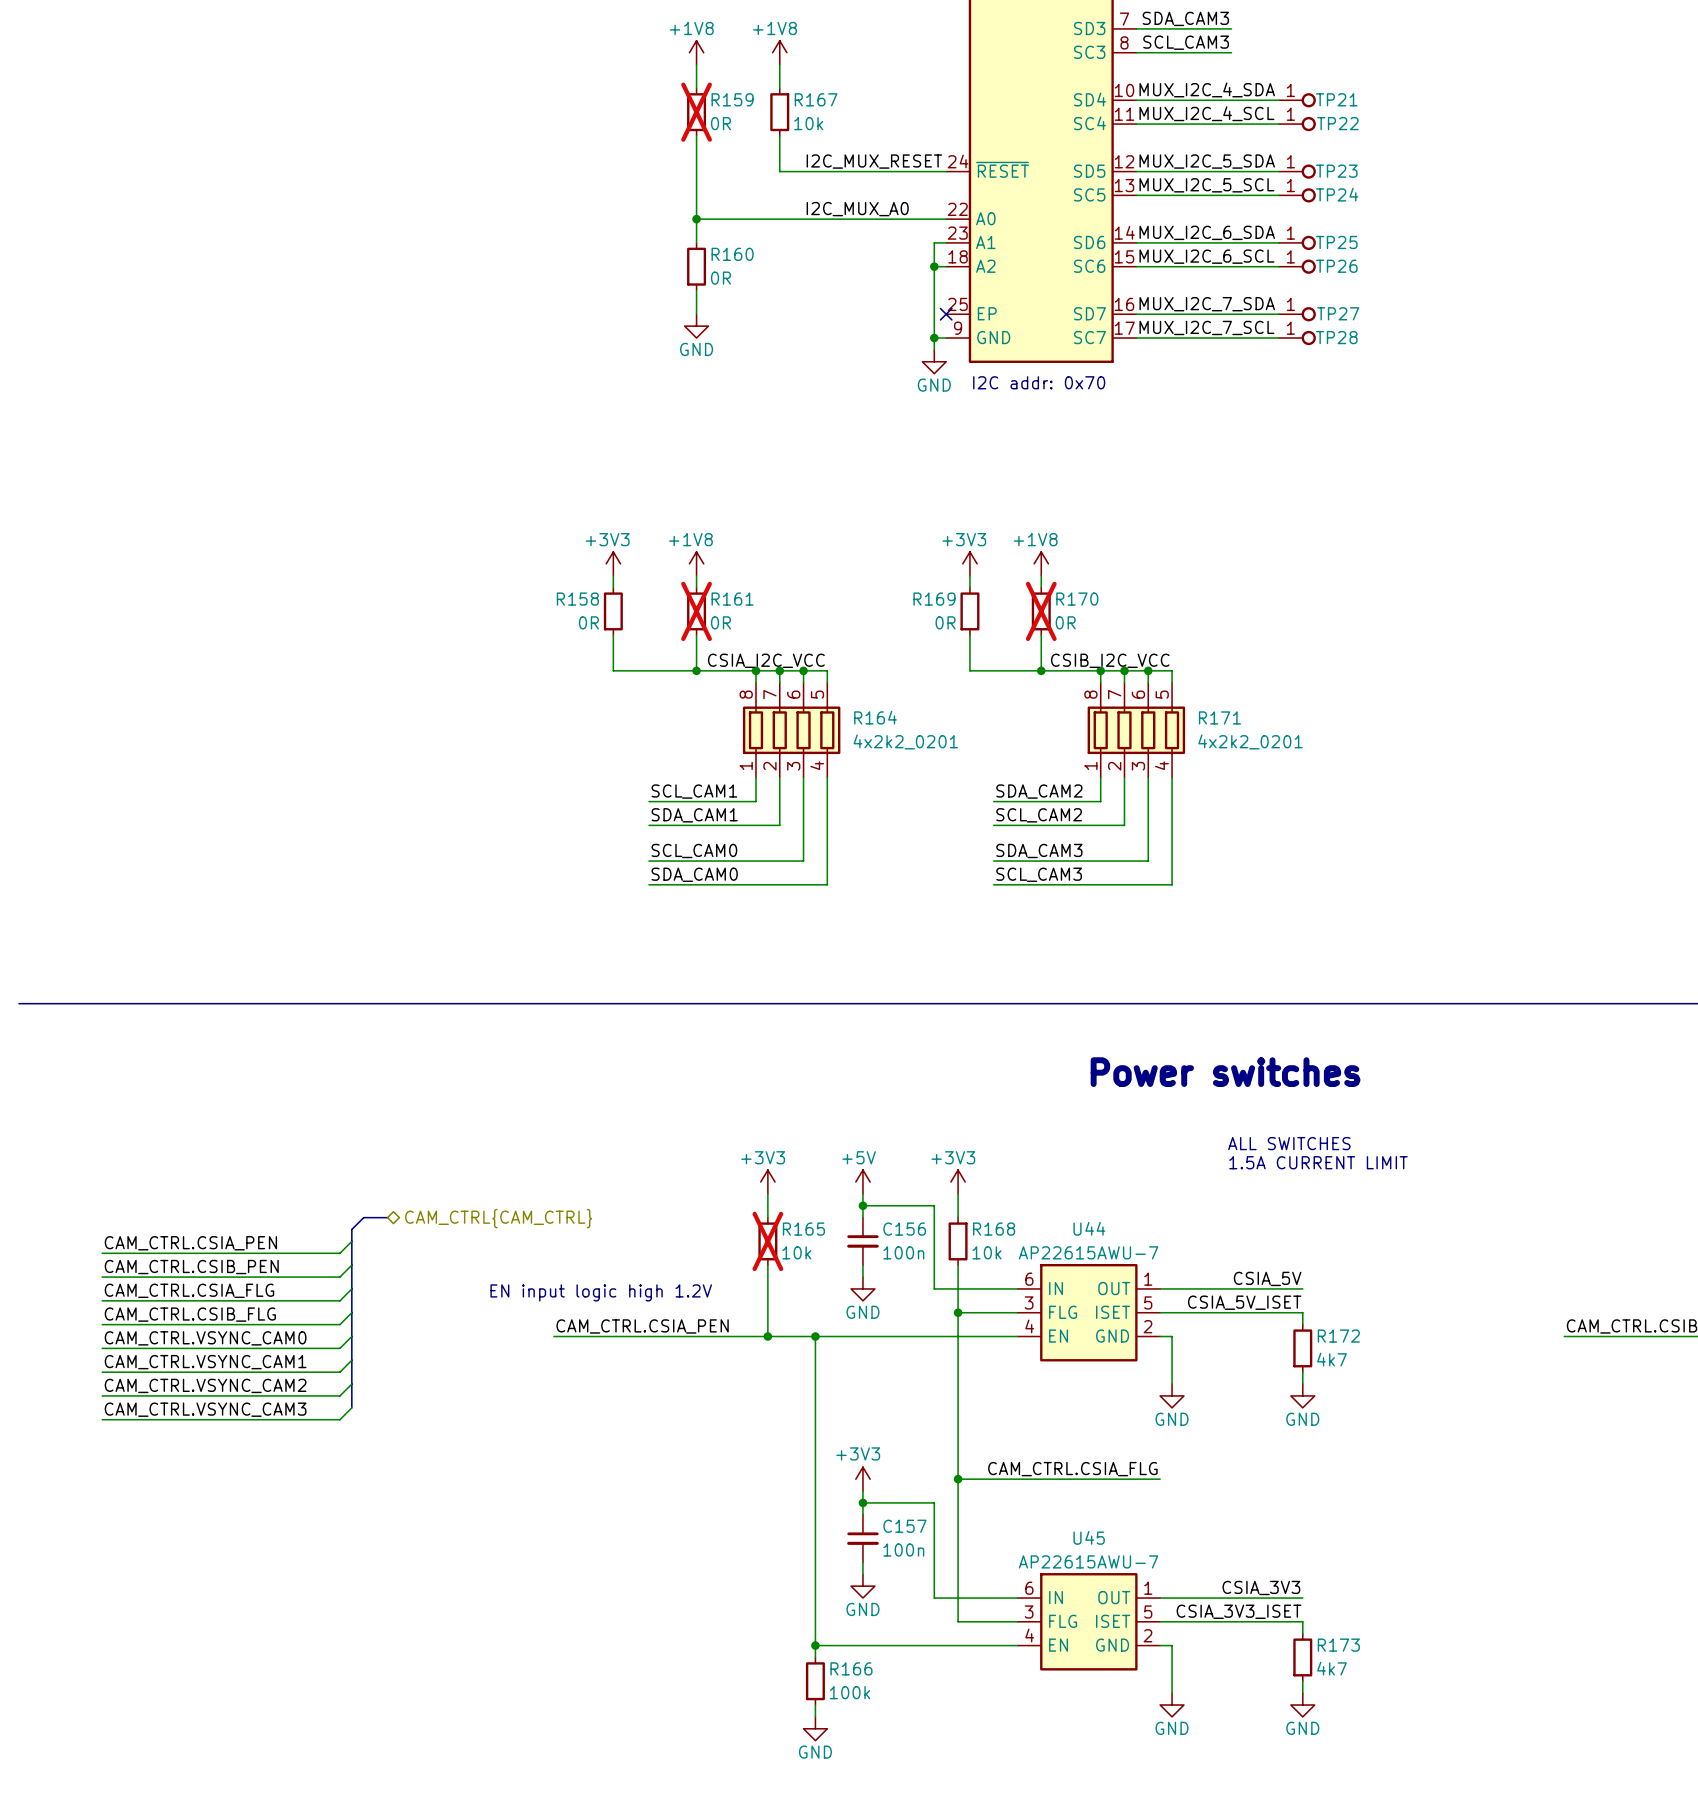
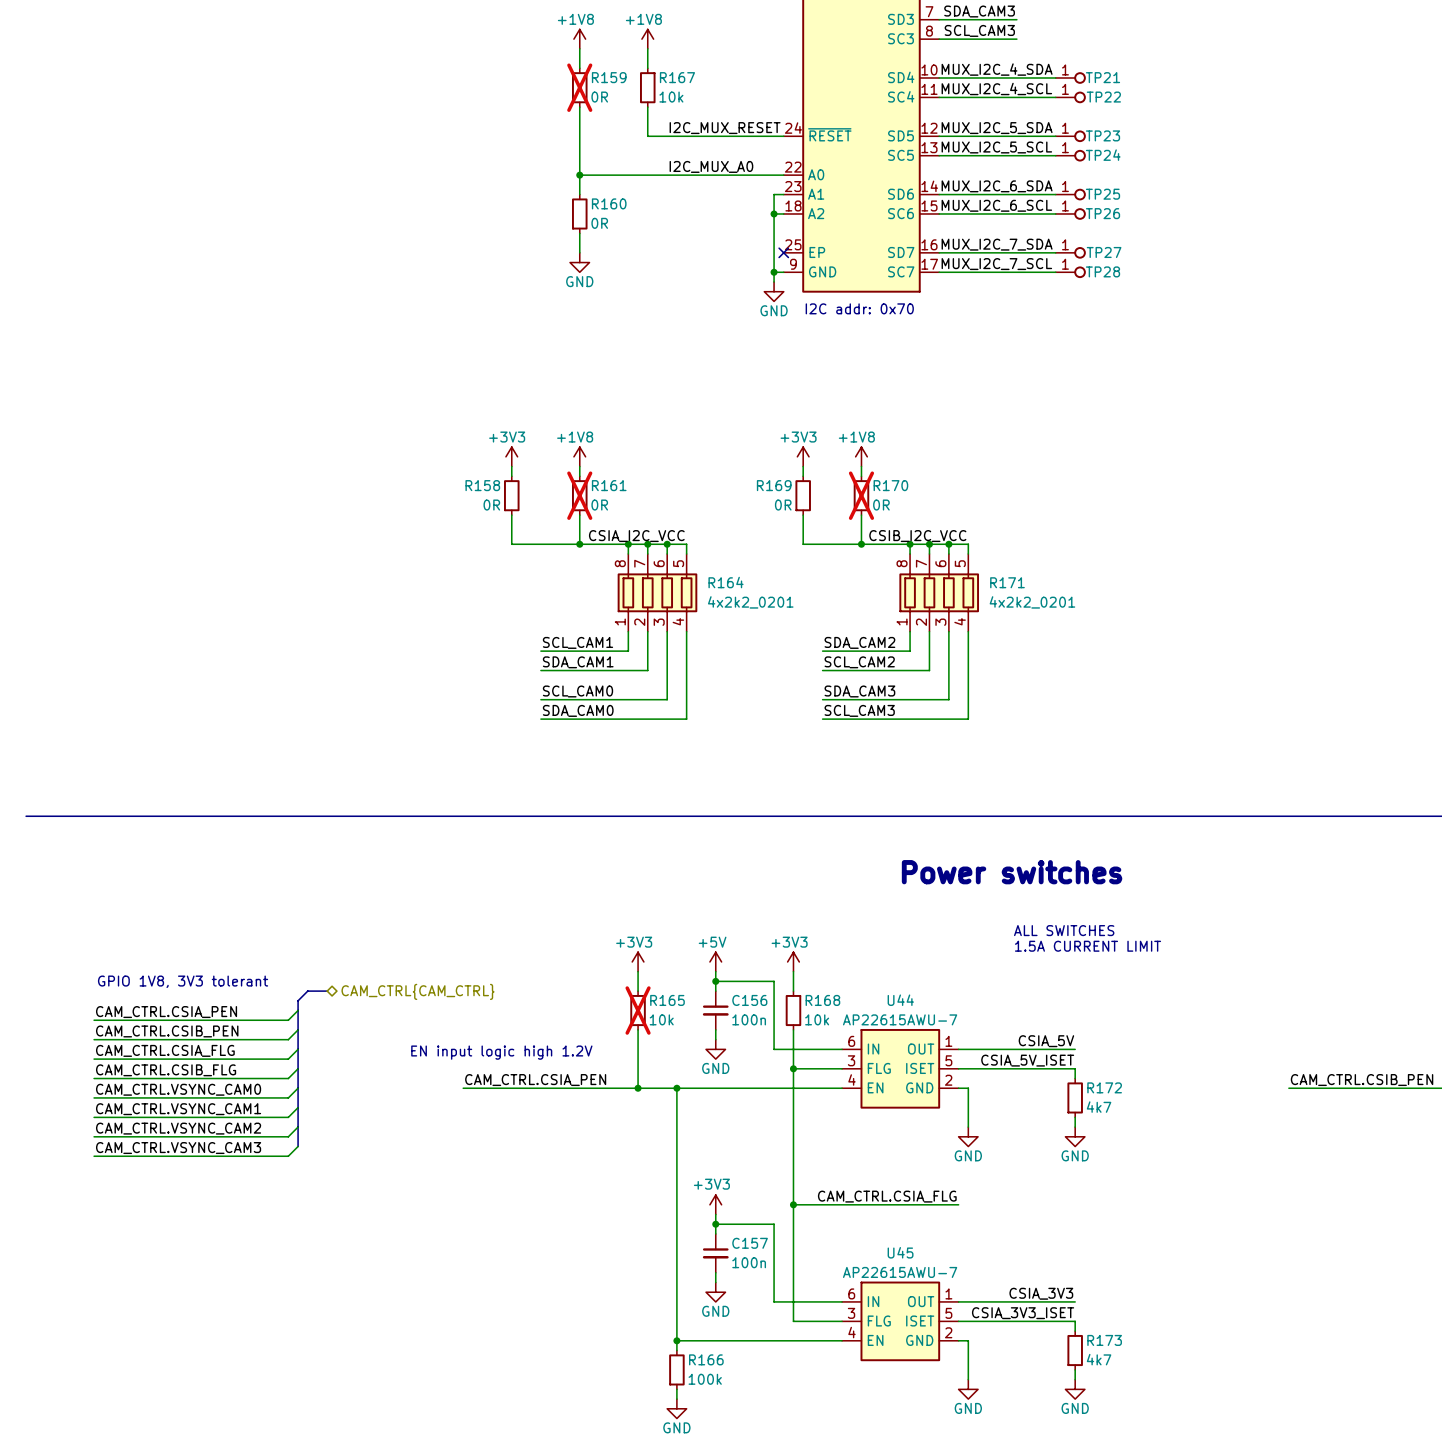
text: none -> GPIO 1V8, 3V3 tolerant (183, 981)

